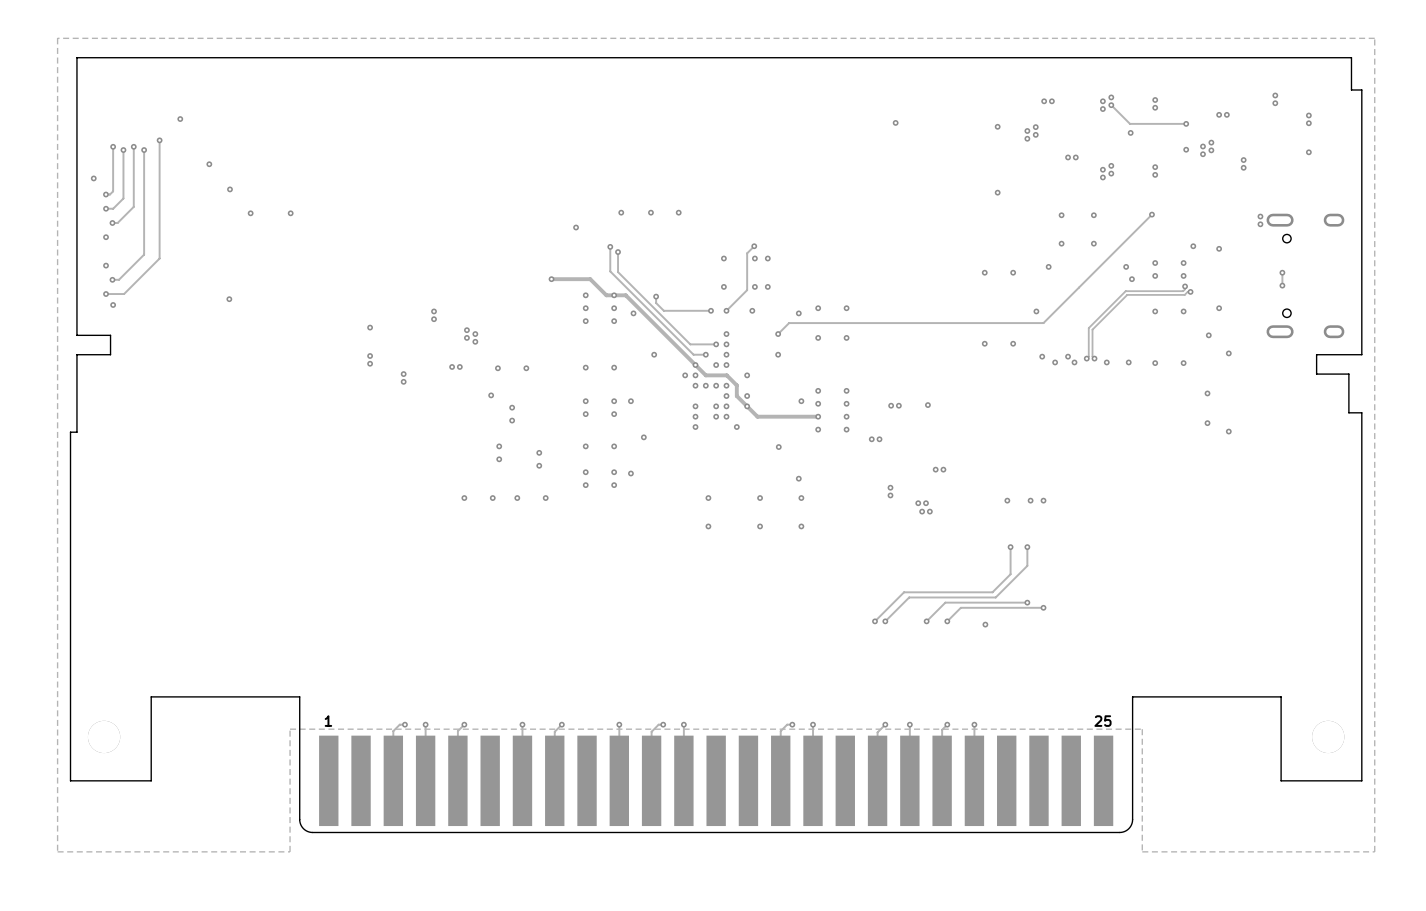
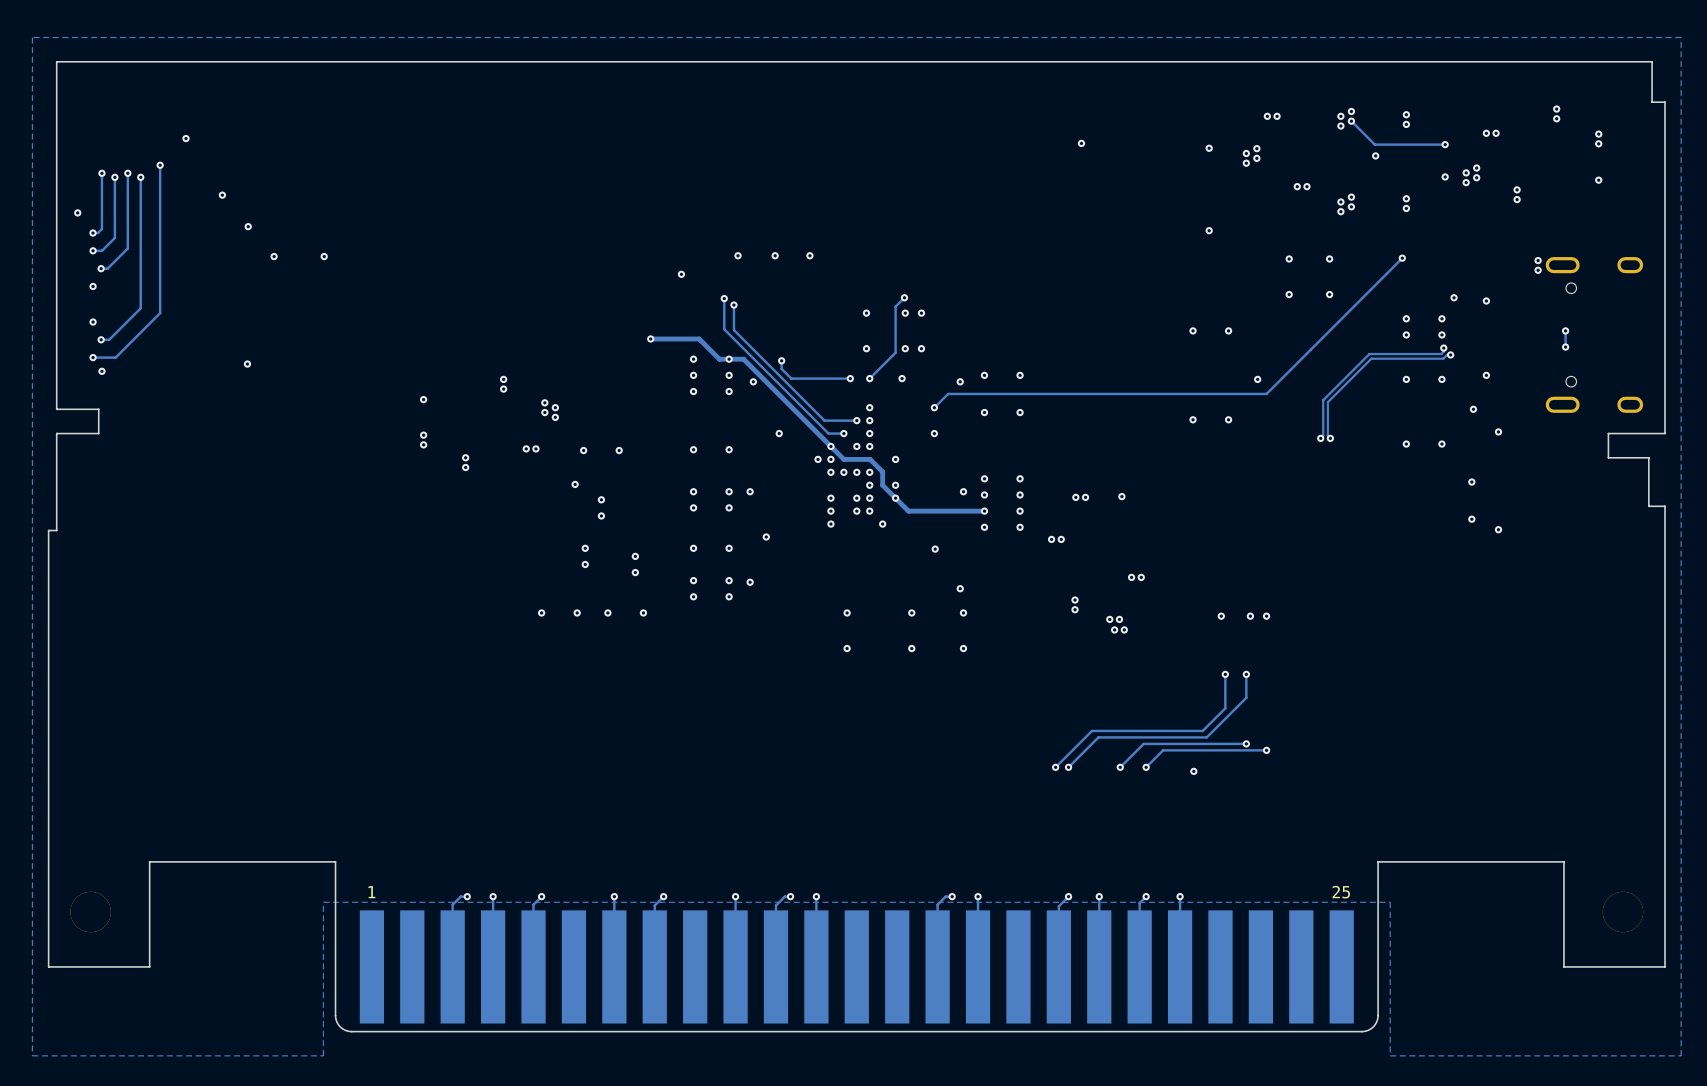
via: (1048, 266) -> none
via: (1126, 266) -> none
via: (1131, 279) -> none
via: (1042, 356) -> none
via: (1068, 356) -> none
via: (1055, 362) -> none
via: (1074, 362) -> none
via: (1106, 362) -> none
via: (1128, 362) -> none

